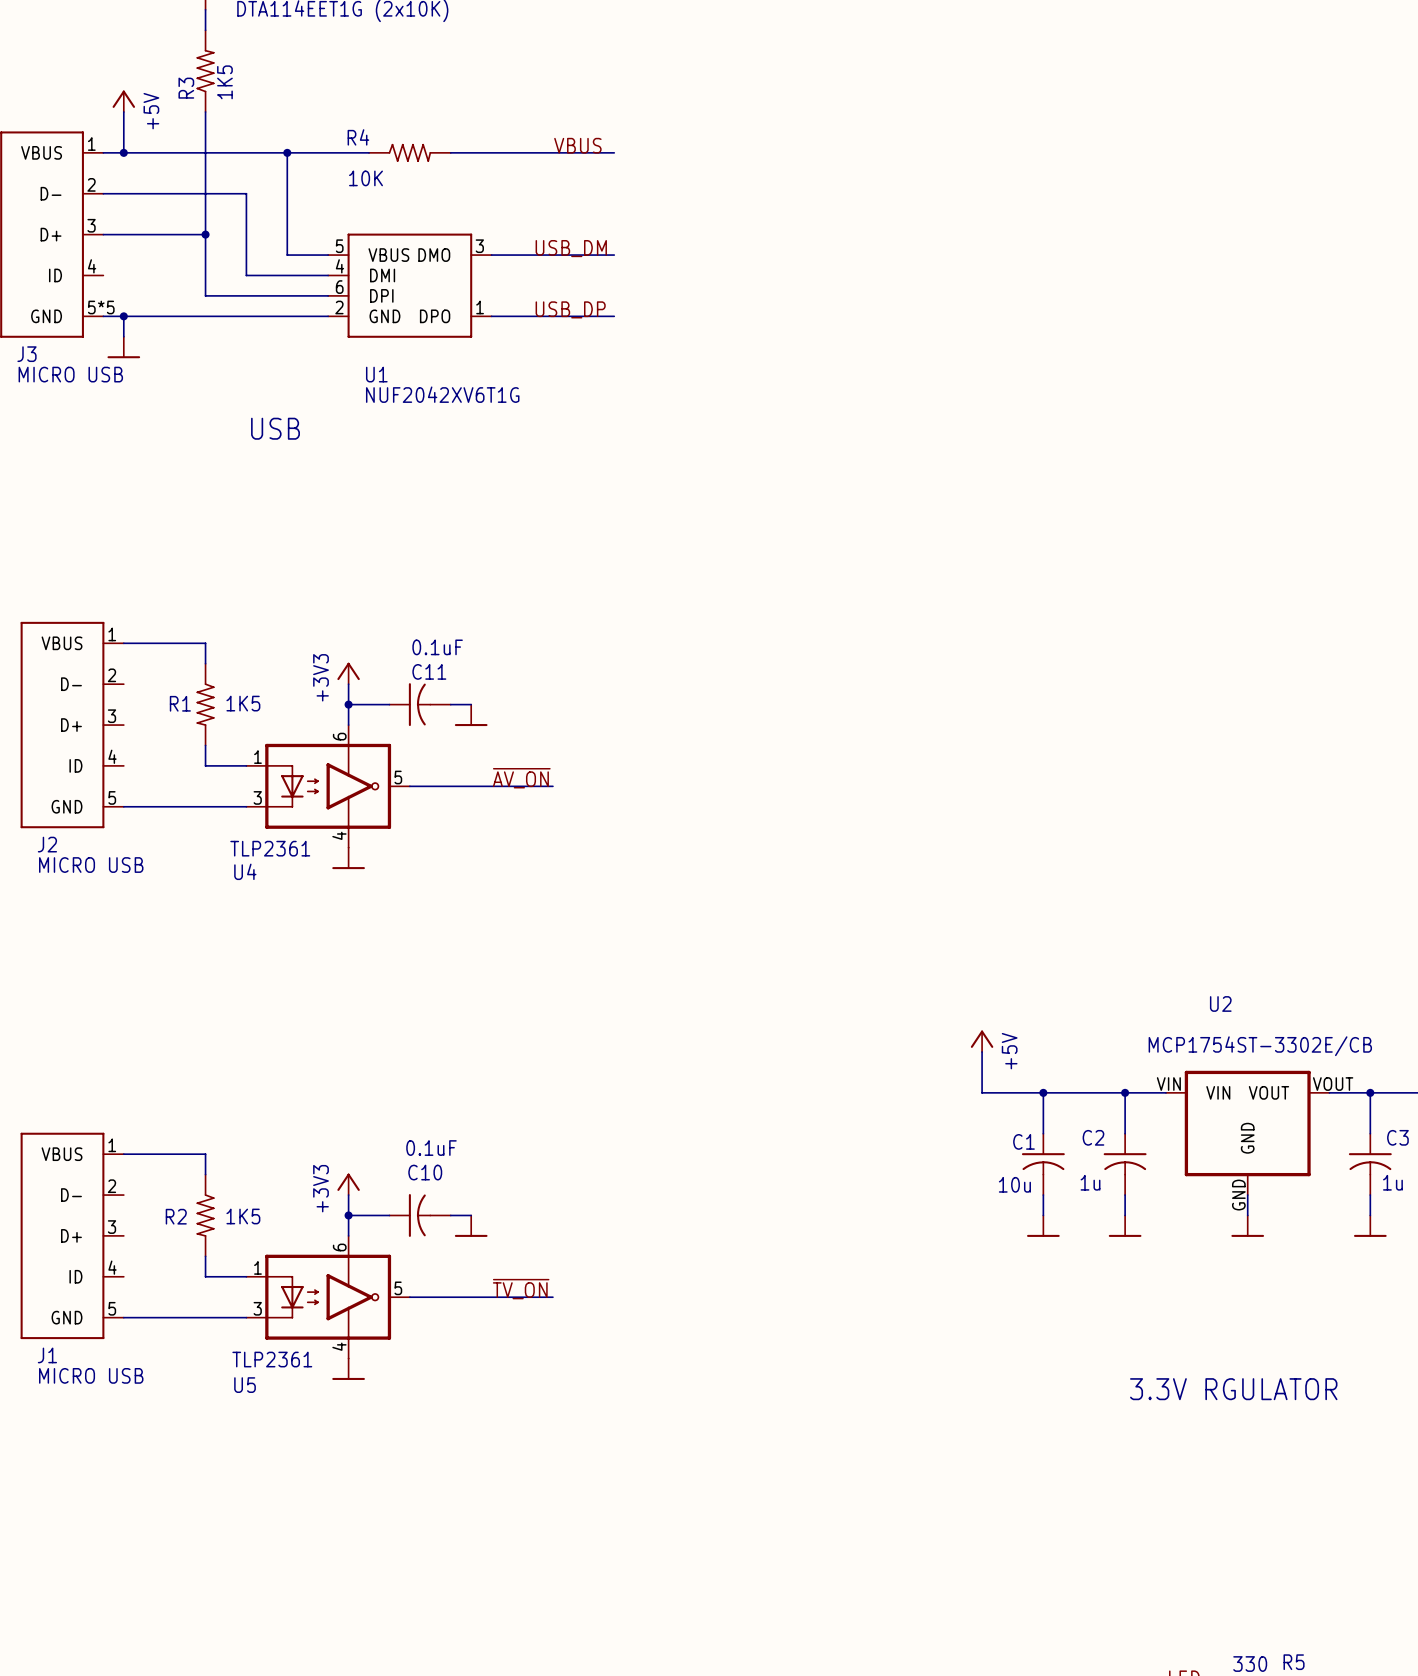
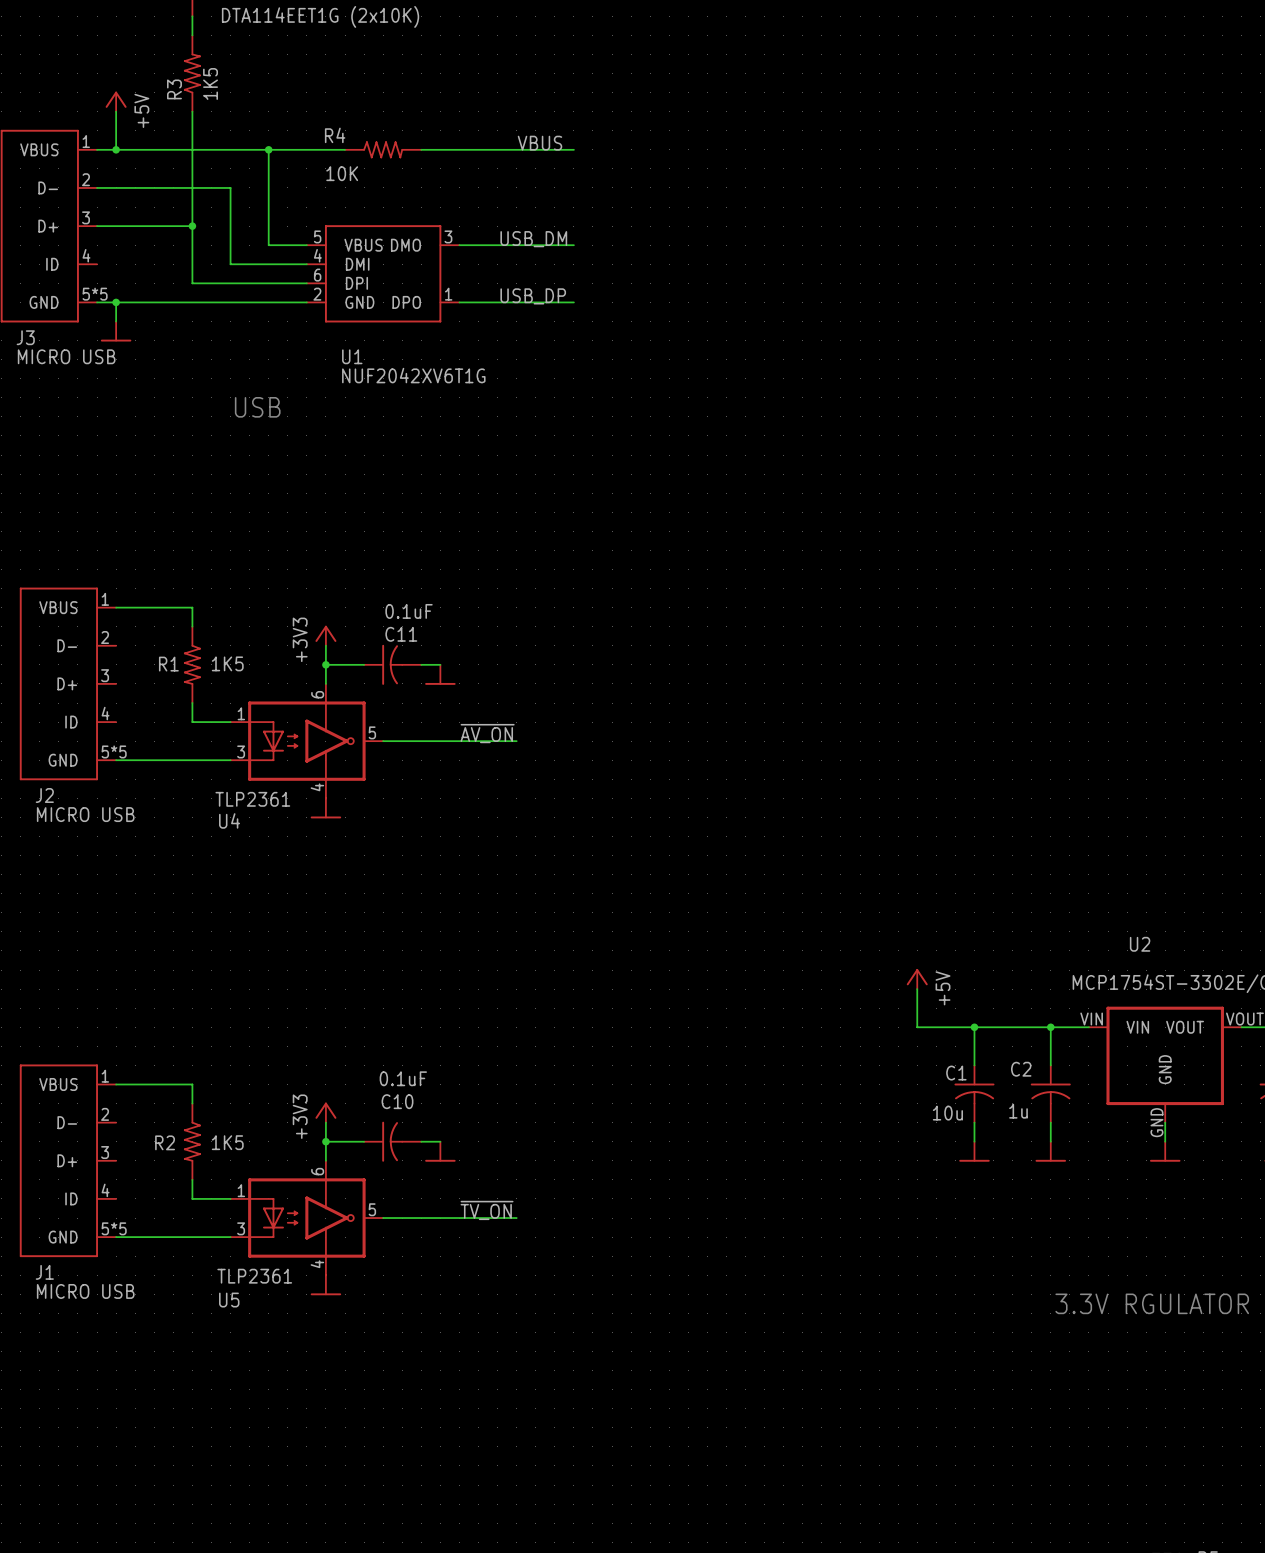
J2 pin number: 5 (112, 797) -> 5*5 (114, 751)
J1 pin number: 5 (112, 1308) -> 5*5 (114, 1228)

